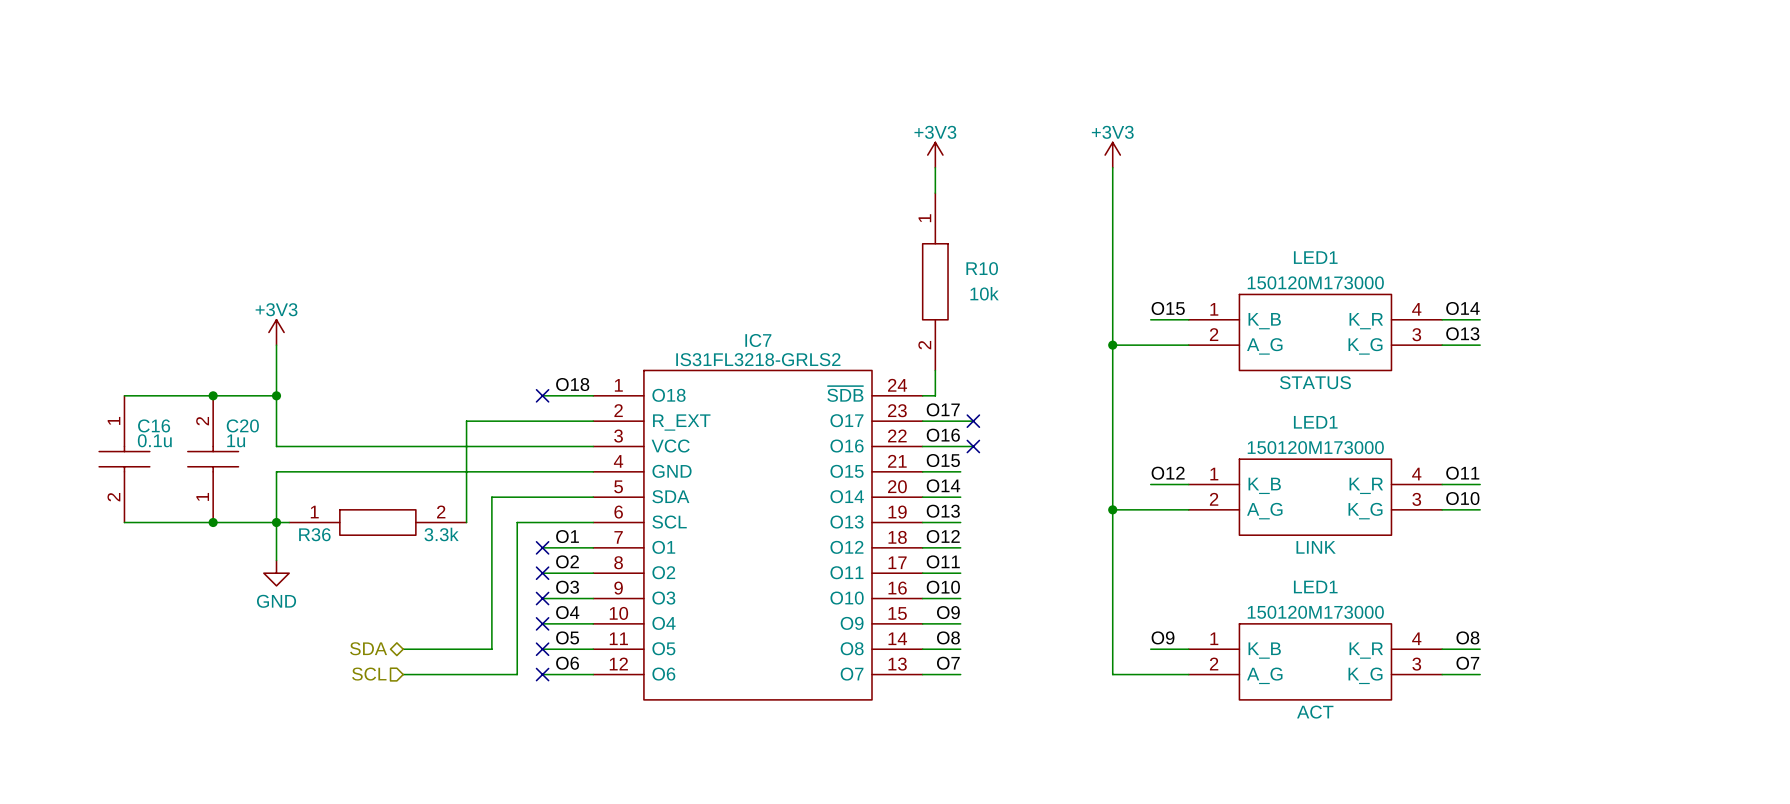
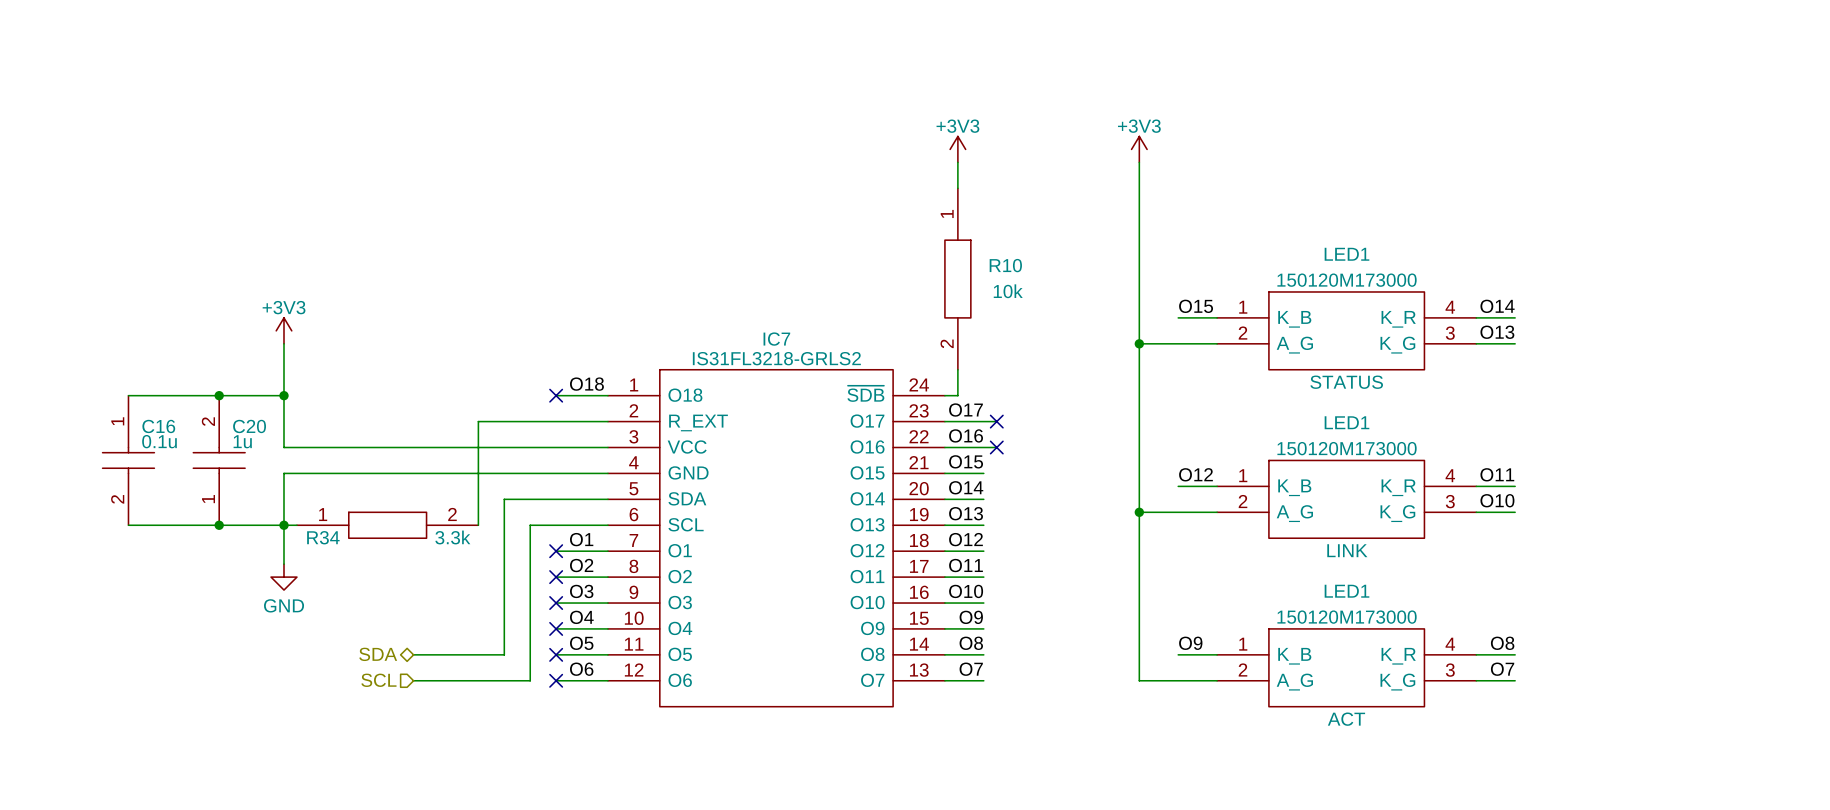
R36 name: R36 (314, 534) -> R34 (323, 537)

